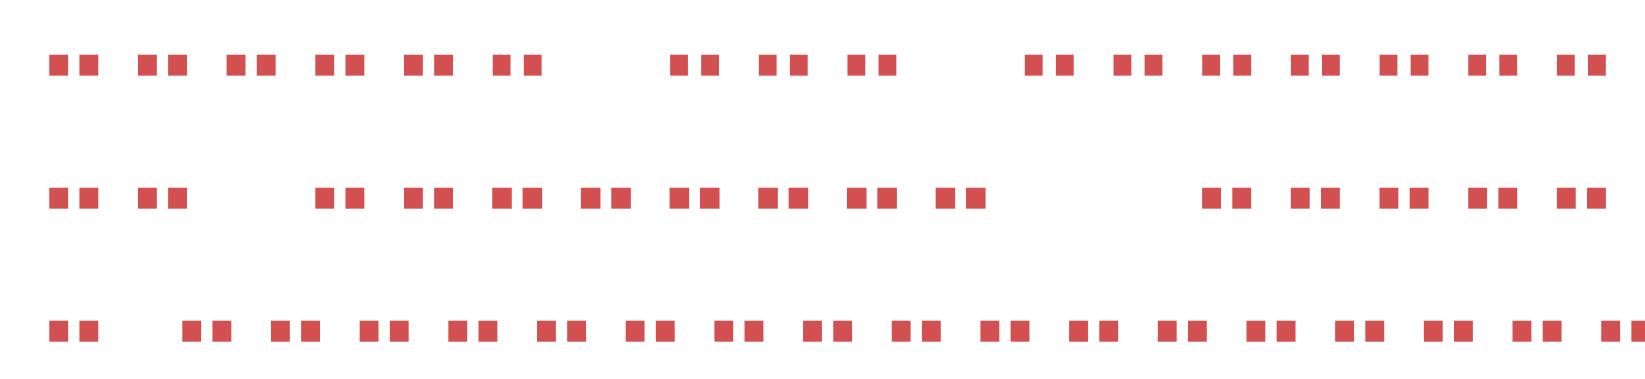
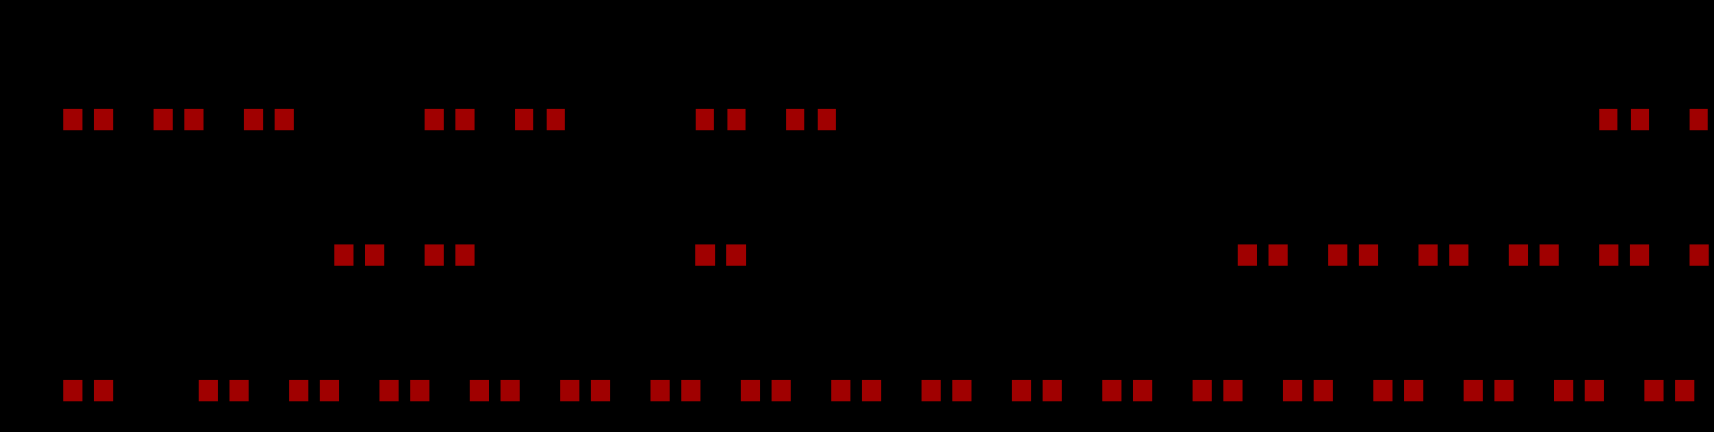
part: (339, 65) -> none
part: (871, 65) -> none
part: (1049, 65) -> none
part: (1137, 65) -> none
part: (1226, 65) -> none
part: (1315, 65) -> none
part: (1404, 65) -> none
part: (1492, 65) -> none
part: (73, 198) -> none
part: (162, 198) -> none
part: (517, 198) -> none
part: (605, 198) -> none
part: (783, 198) -> none
part: (871, 198) -> none
part: (960, 198) -> none

